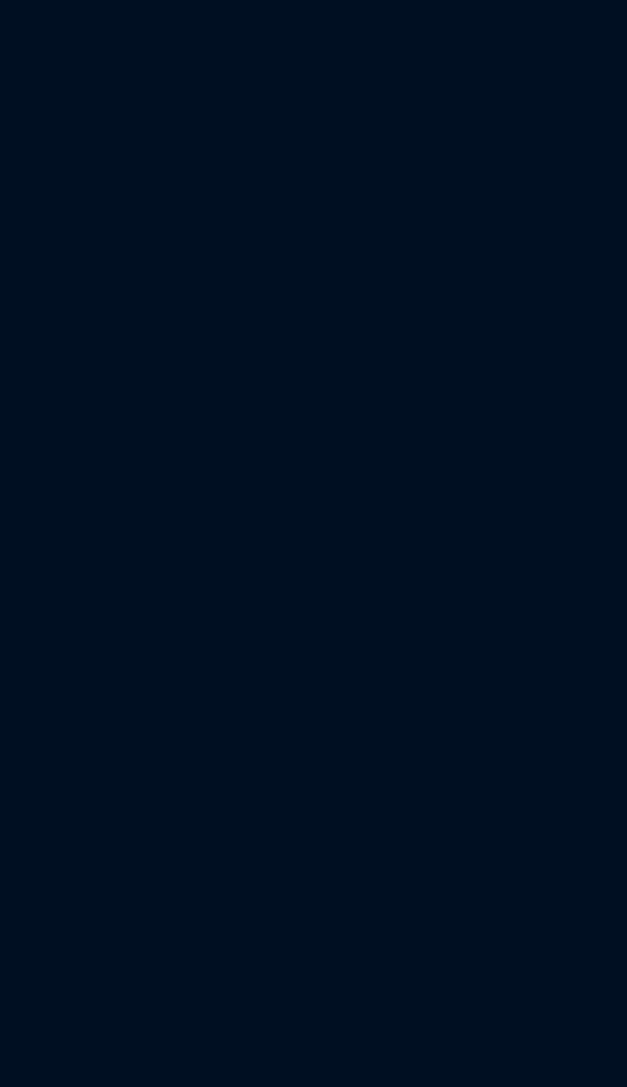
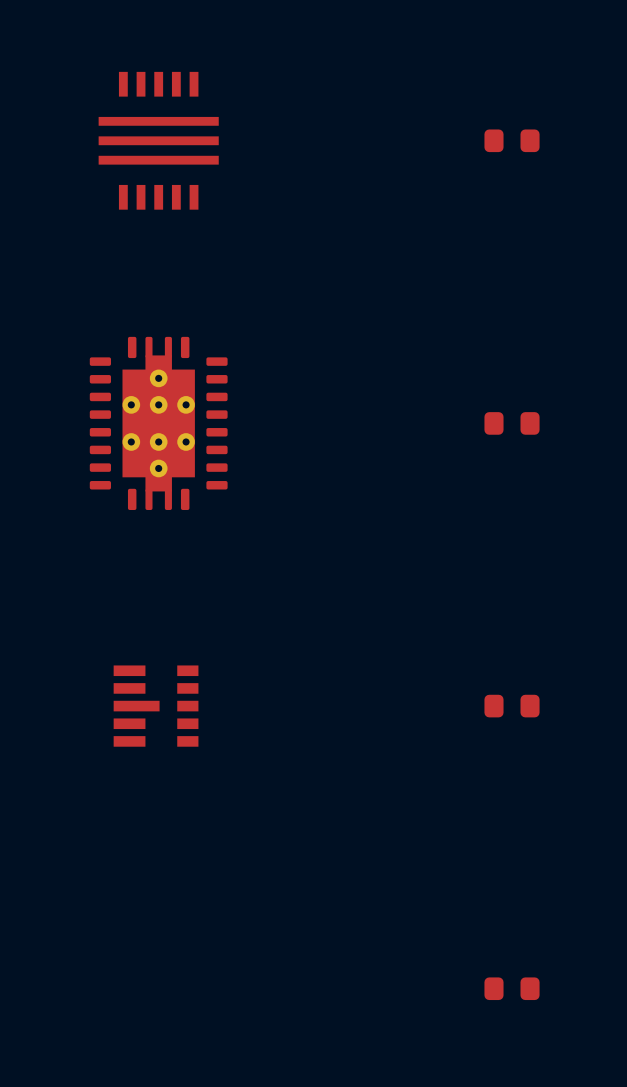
part: none -> (158, 140)
part: none -> (512, 140)
part: none -> (158, 423)
part: none -> (512, 423)
part: none -> (156, 706)
part: none -> (512, 706)
part: none -> (512, 988)

